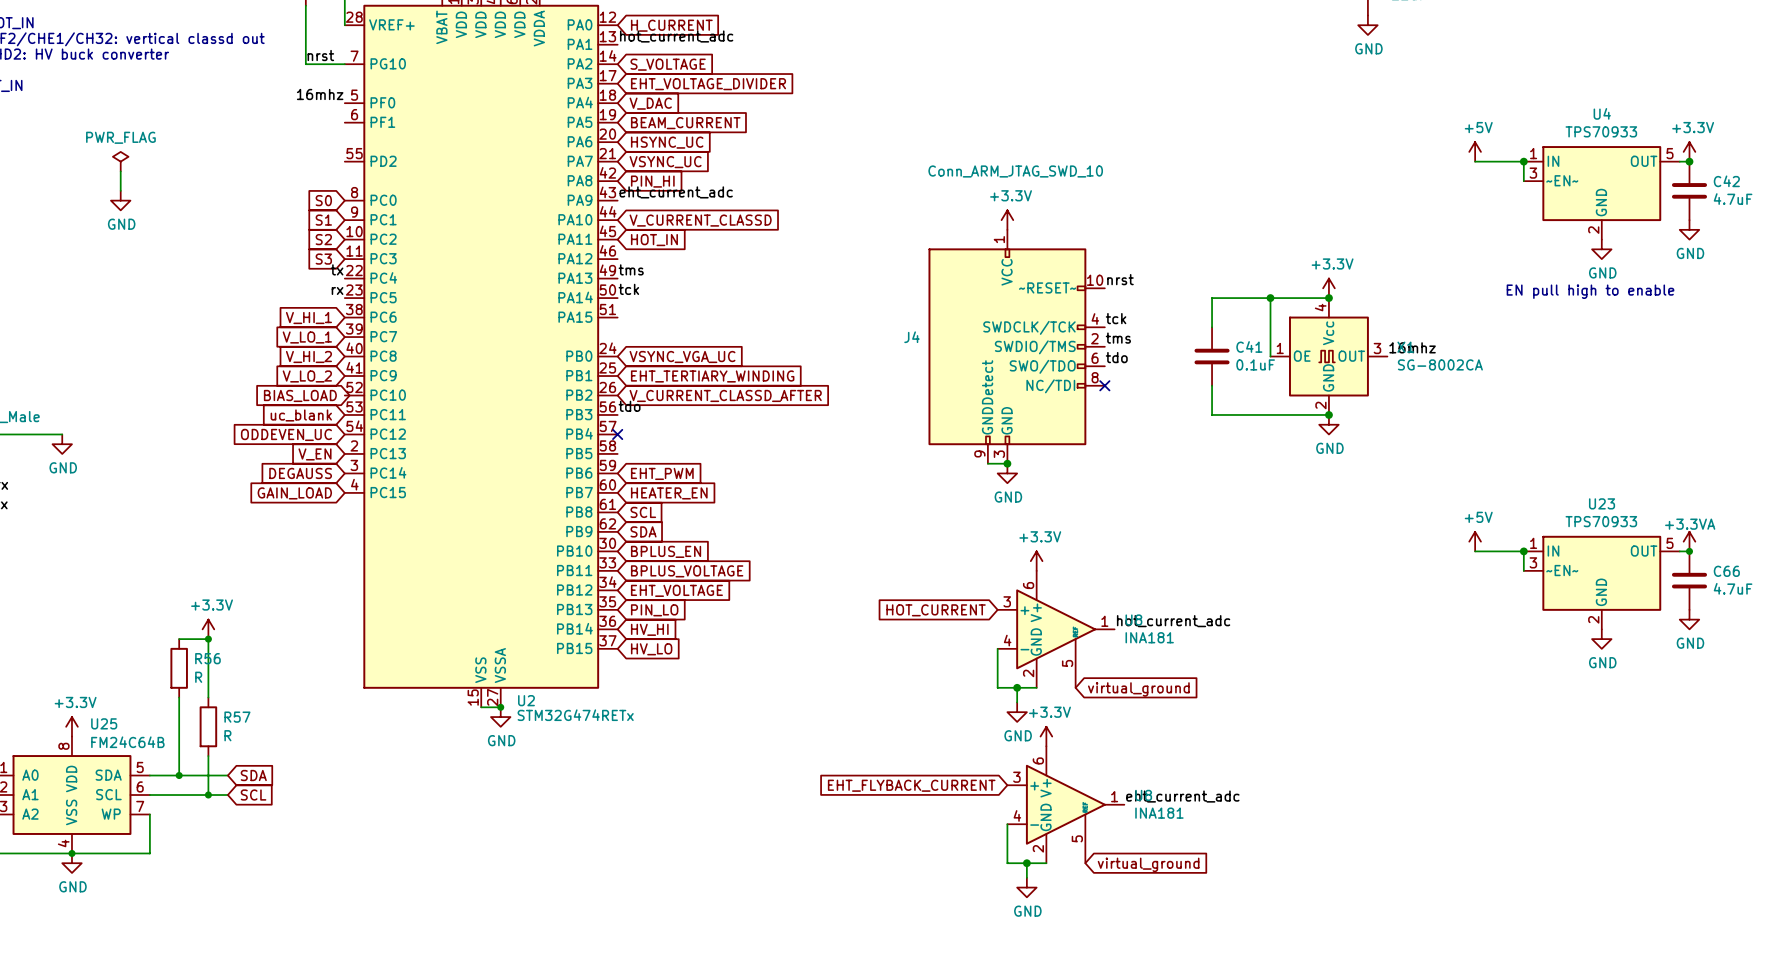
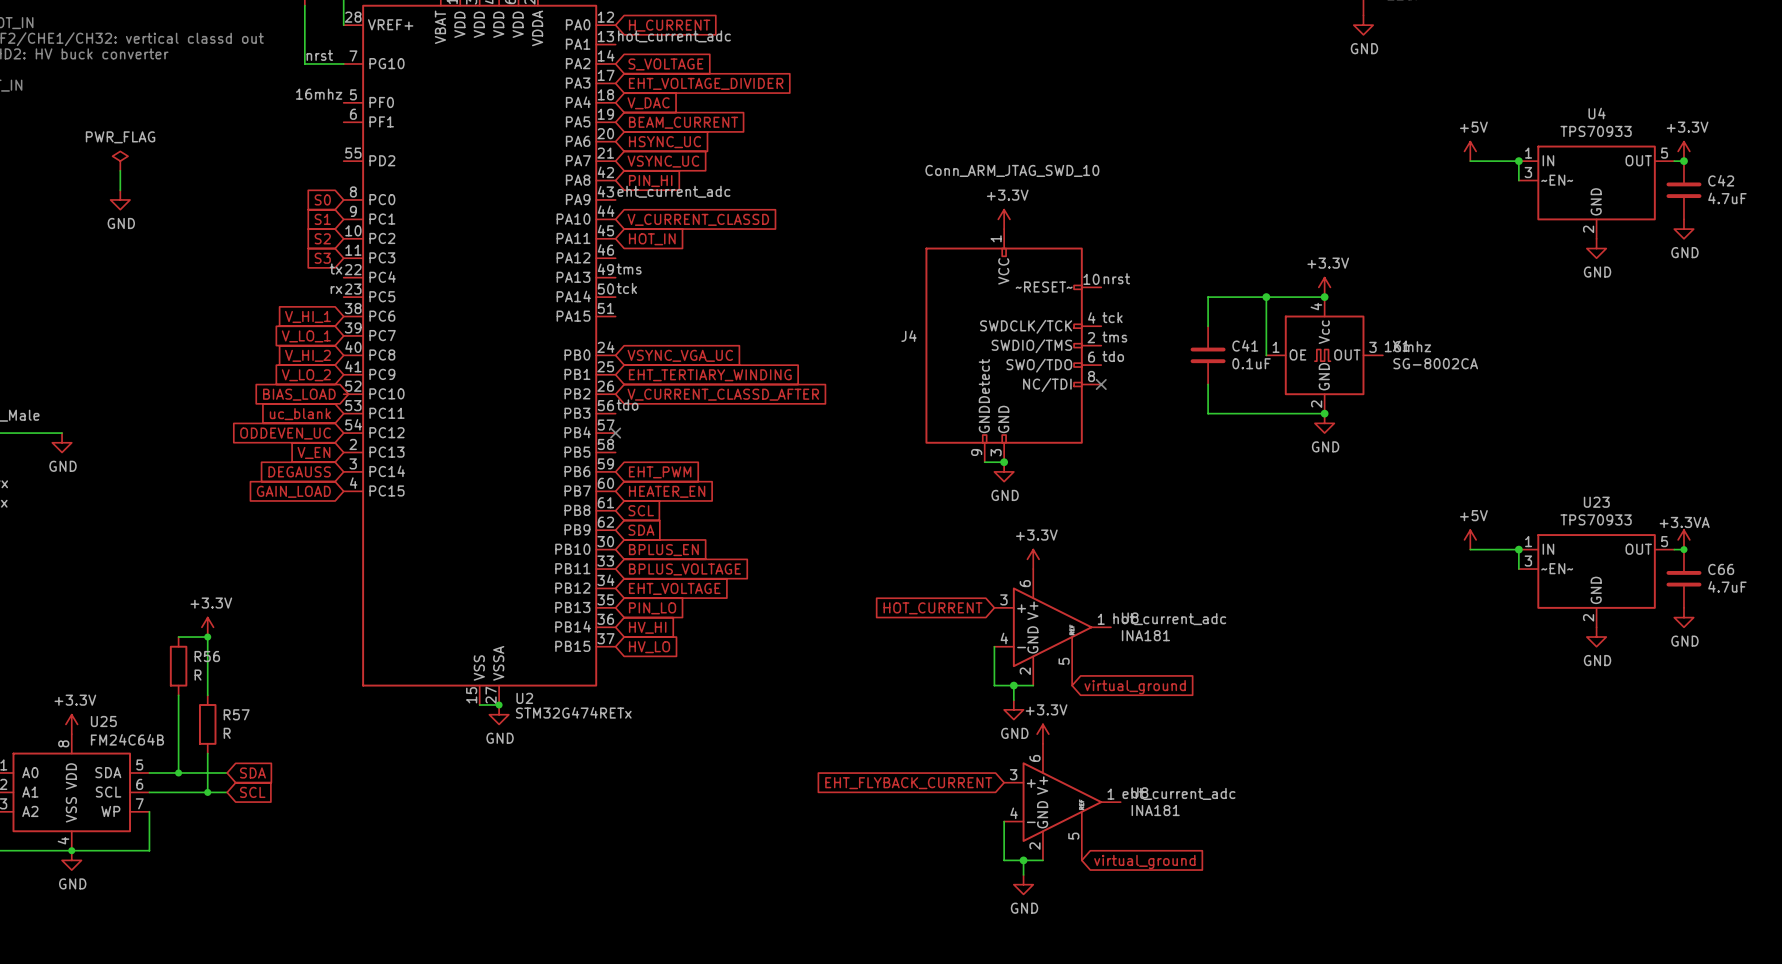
text: EN pull high to enable (1590, 291) -> none

